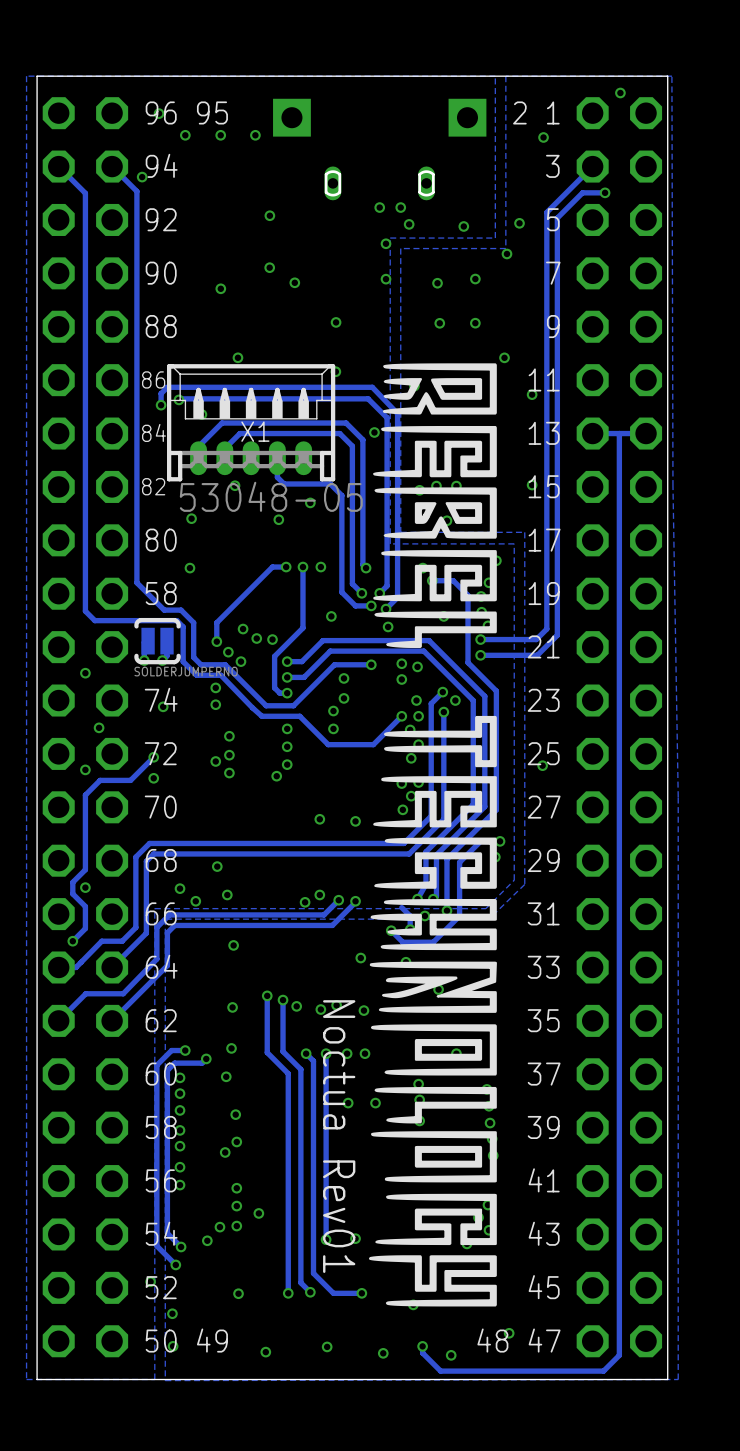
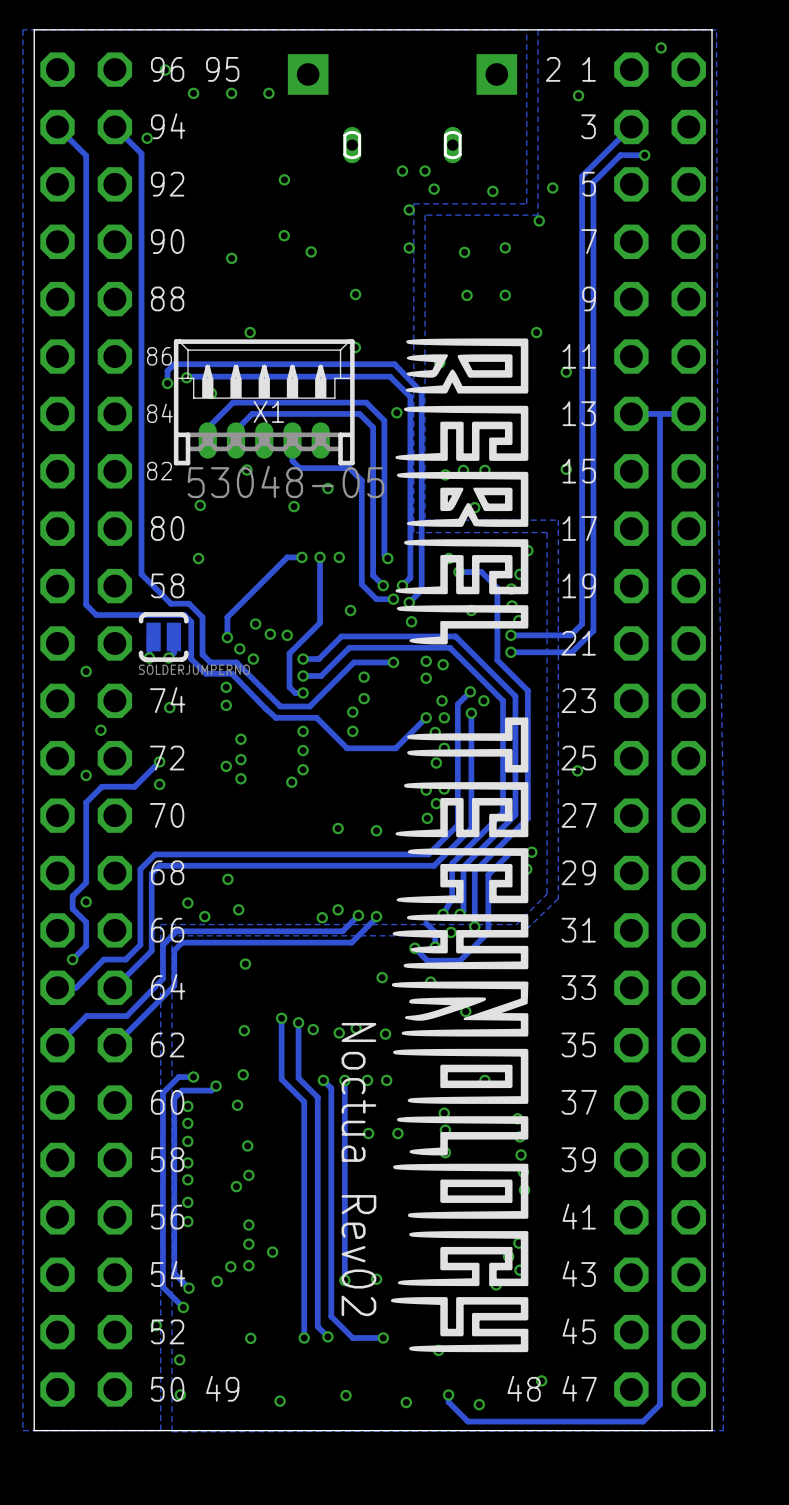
text: Noctua Rev01 (339, 1136) -> Noctua Rev02 (358, 1169)

